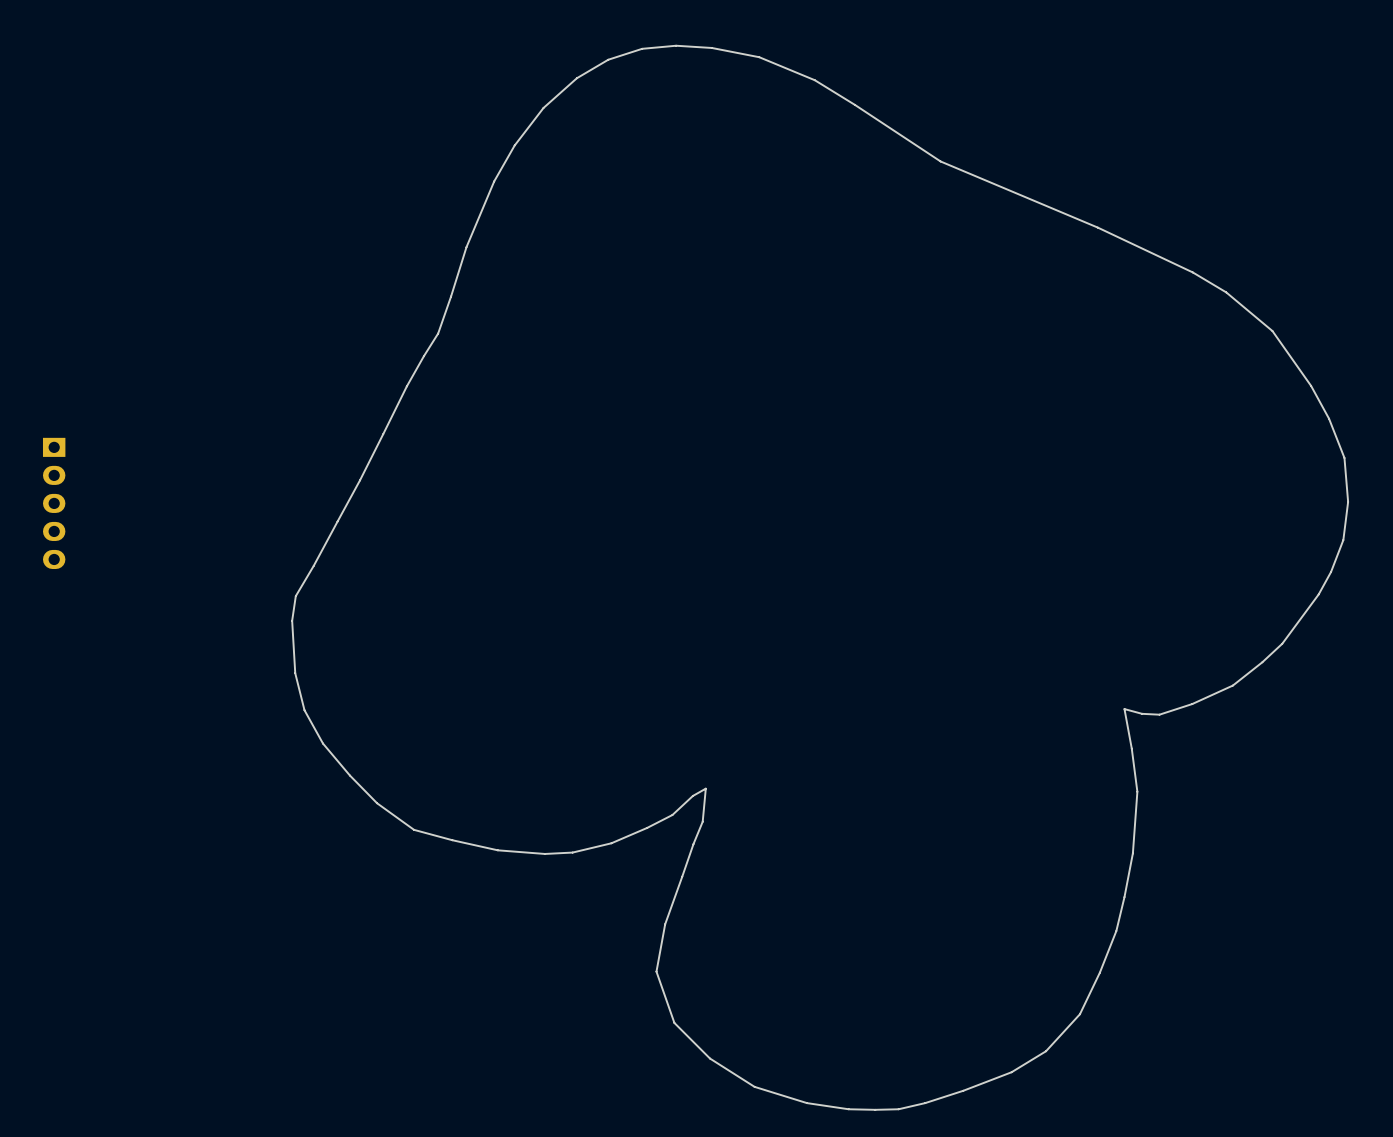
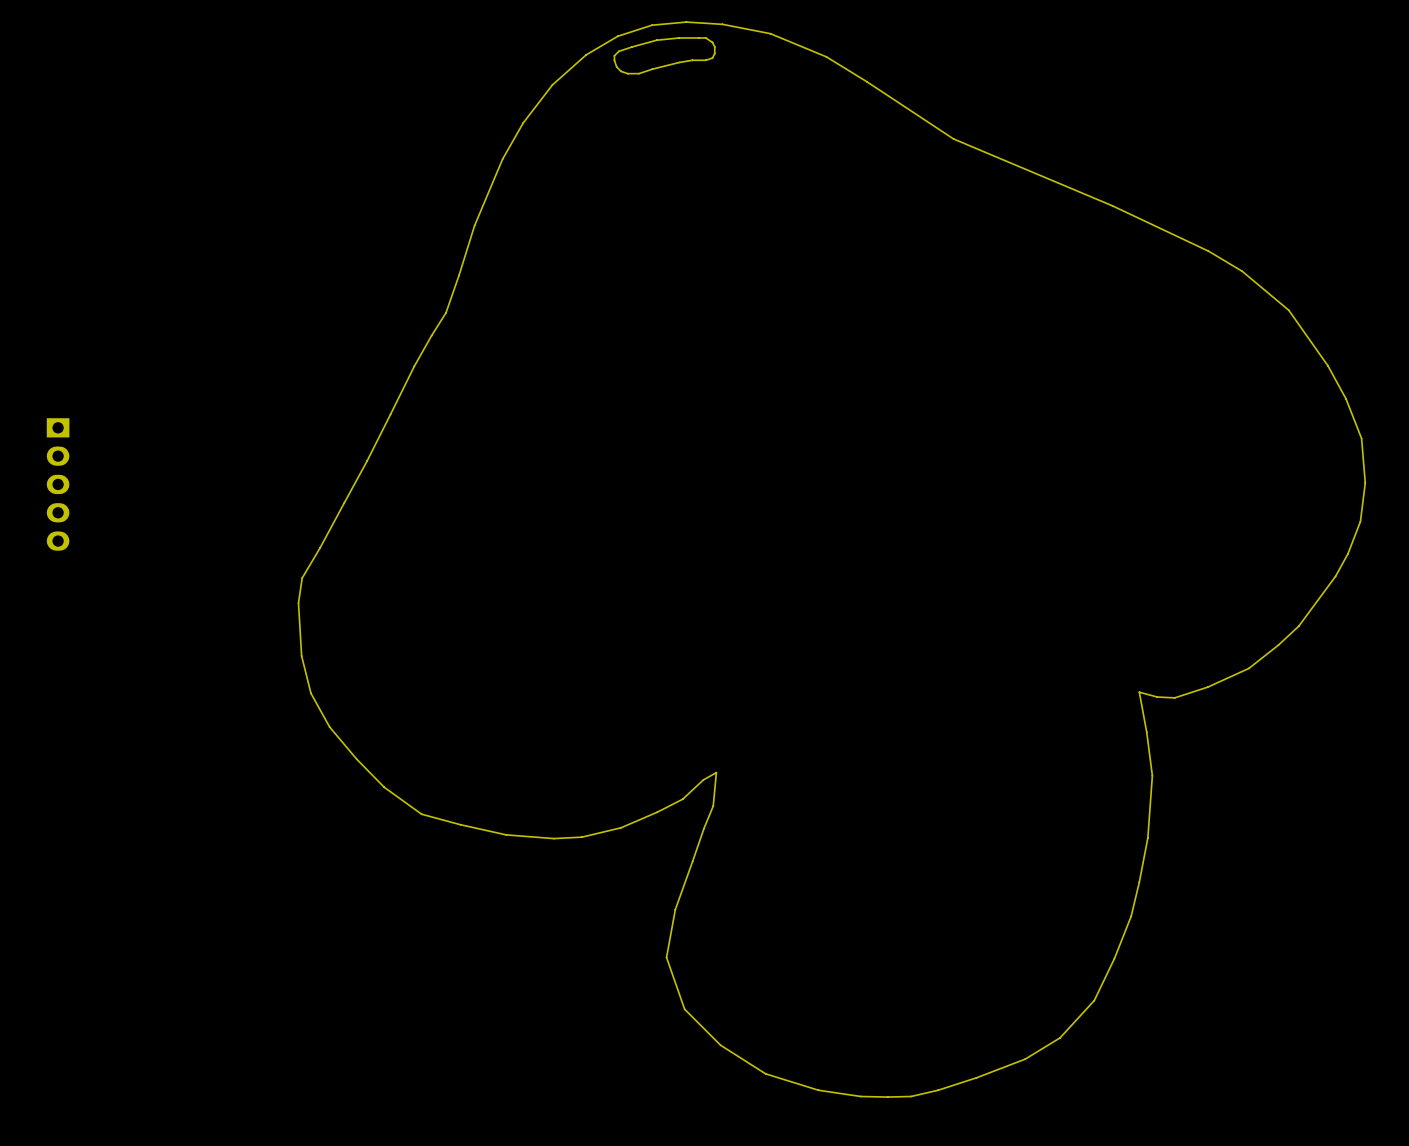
board edge: none -> (705, 37) (712, 42) (714, 46) (712, 58) (705, 60) (679, 62) (638, 73) (621, 71) (616, 66) (614, 60) (614, 55) (618, 51) (656, 40) (705, 37)

